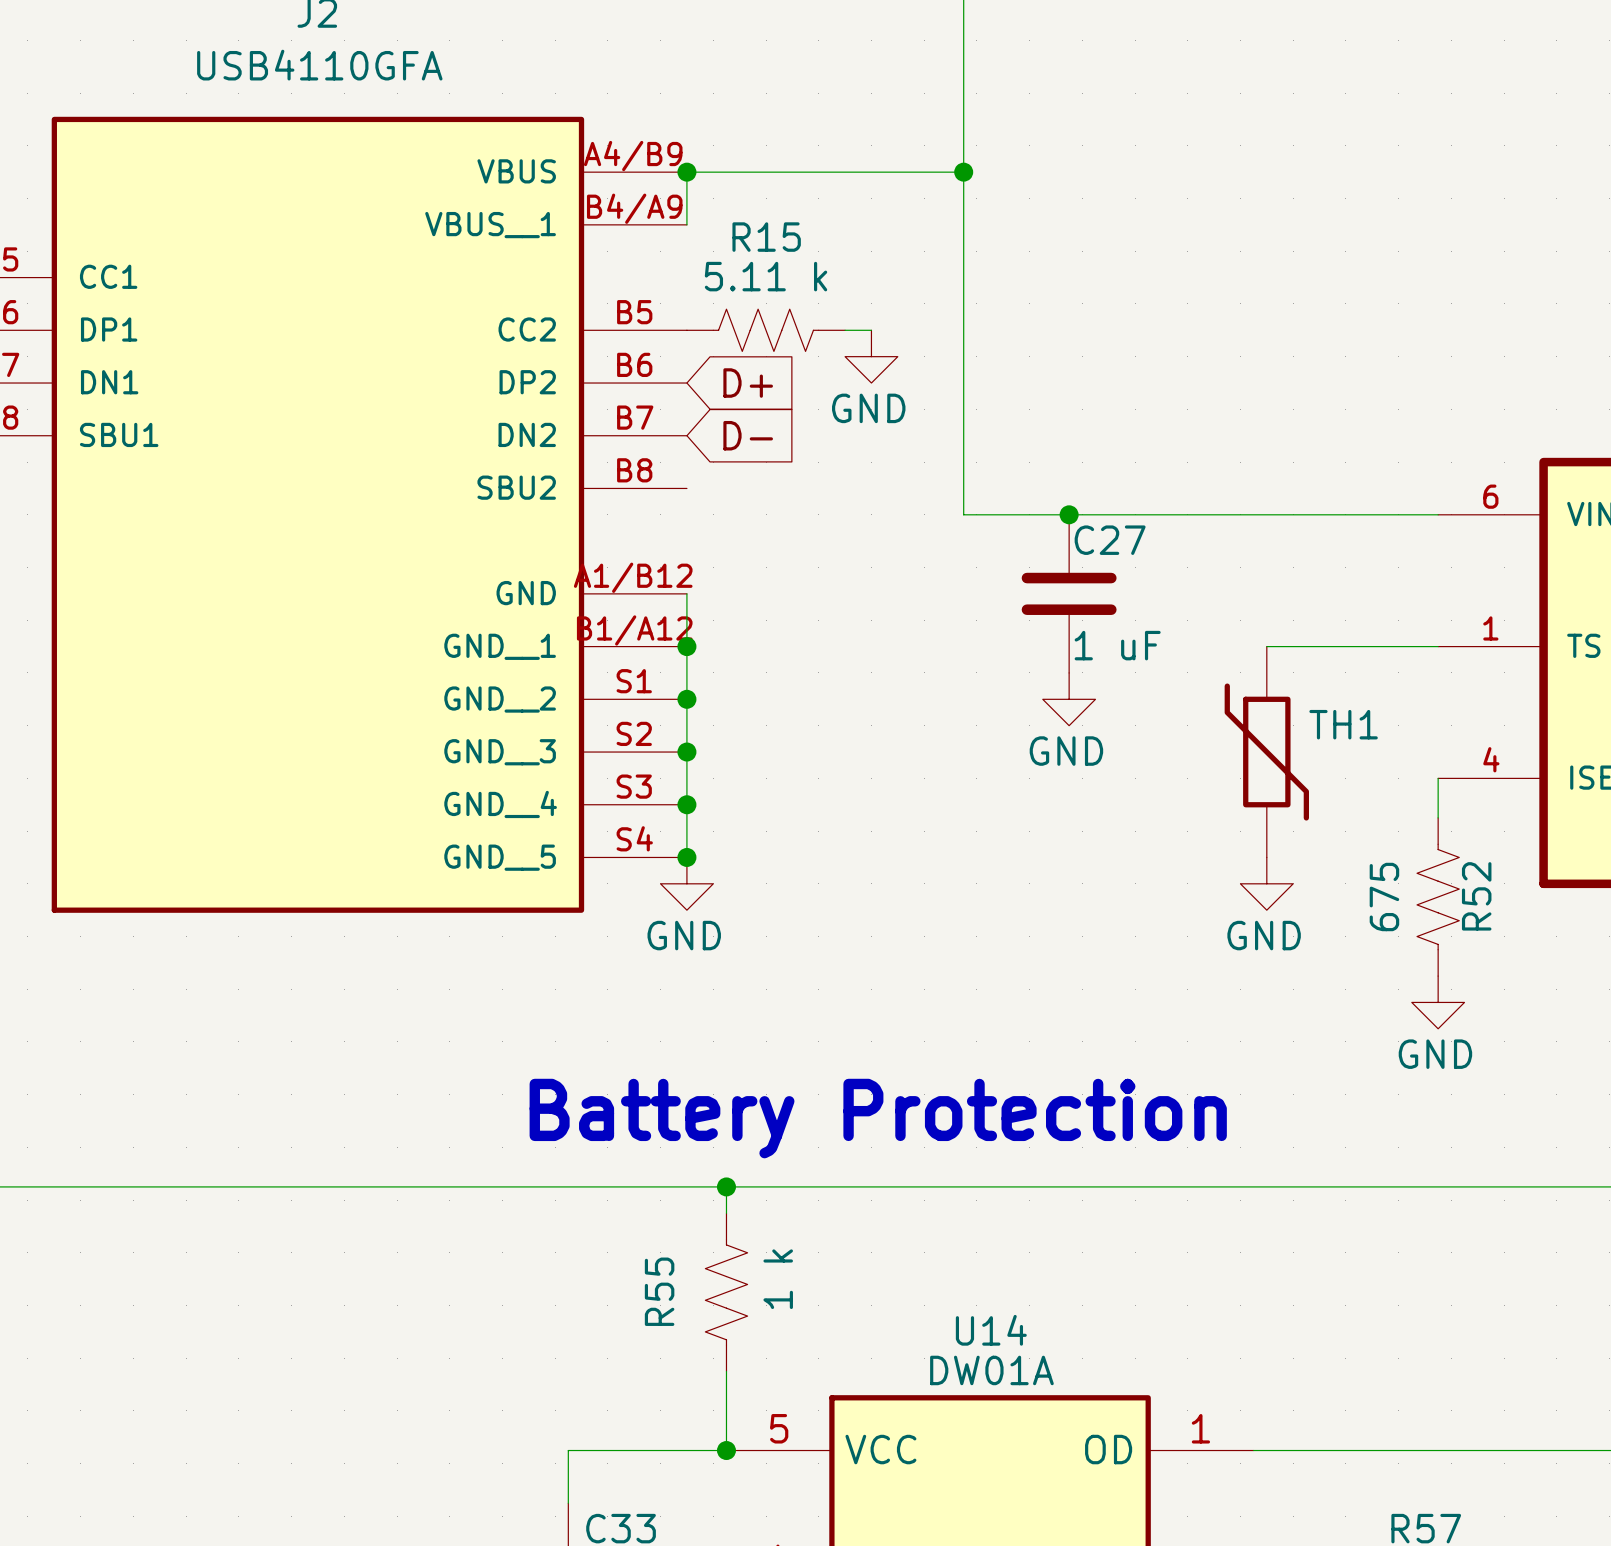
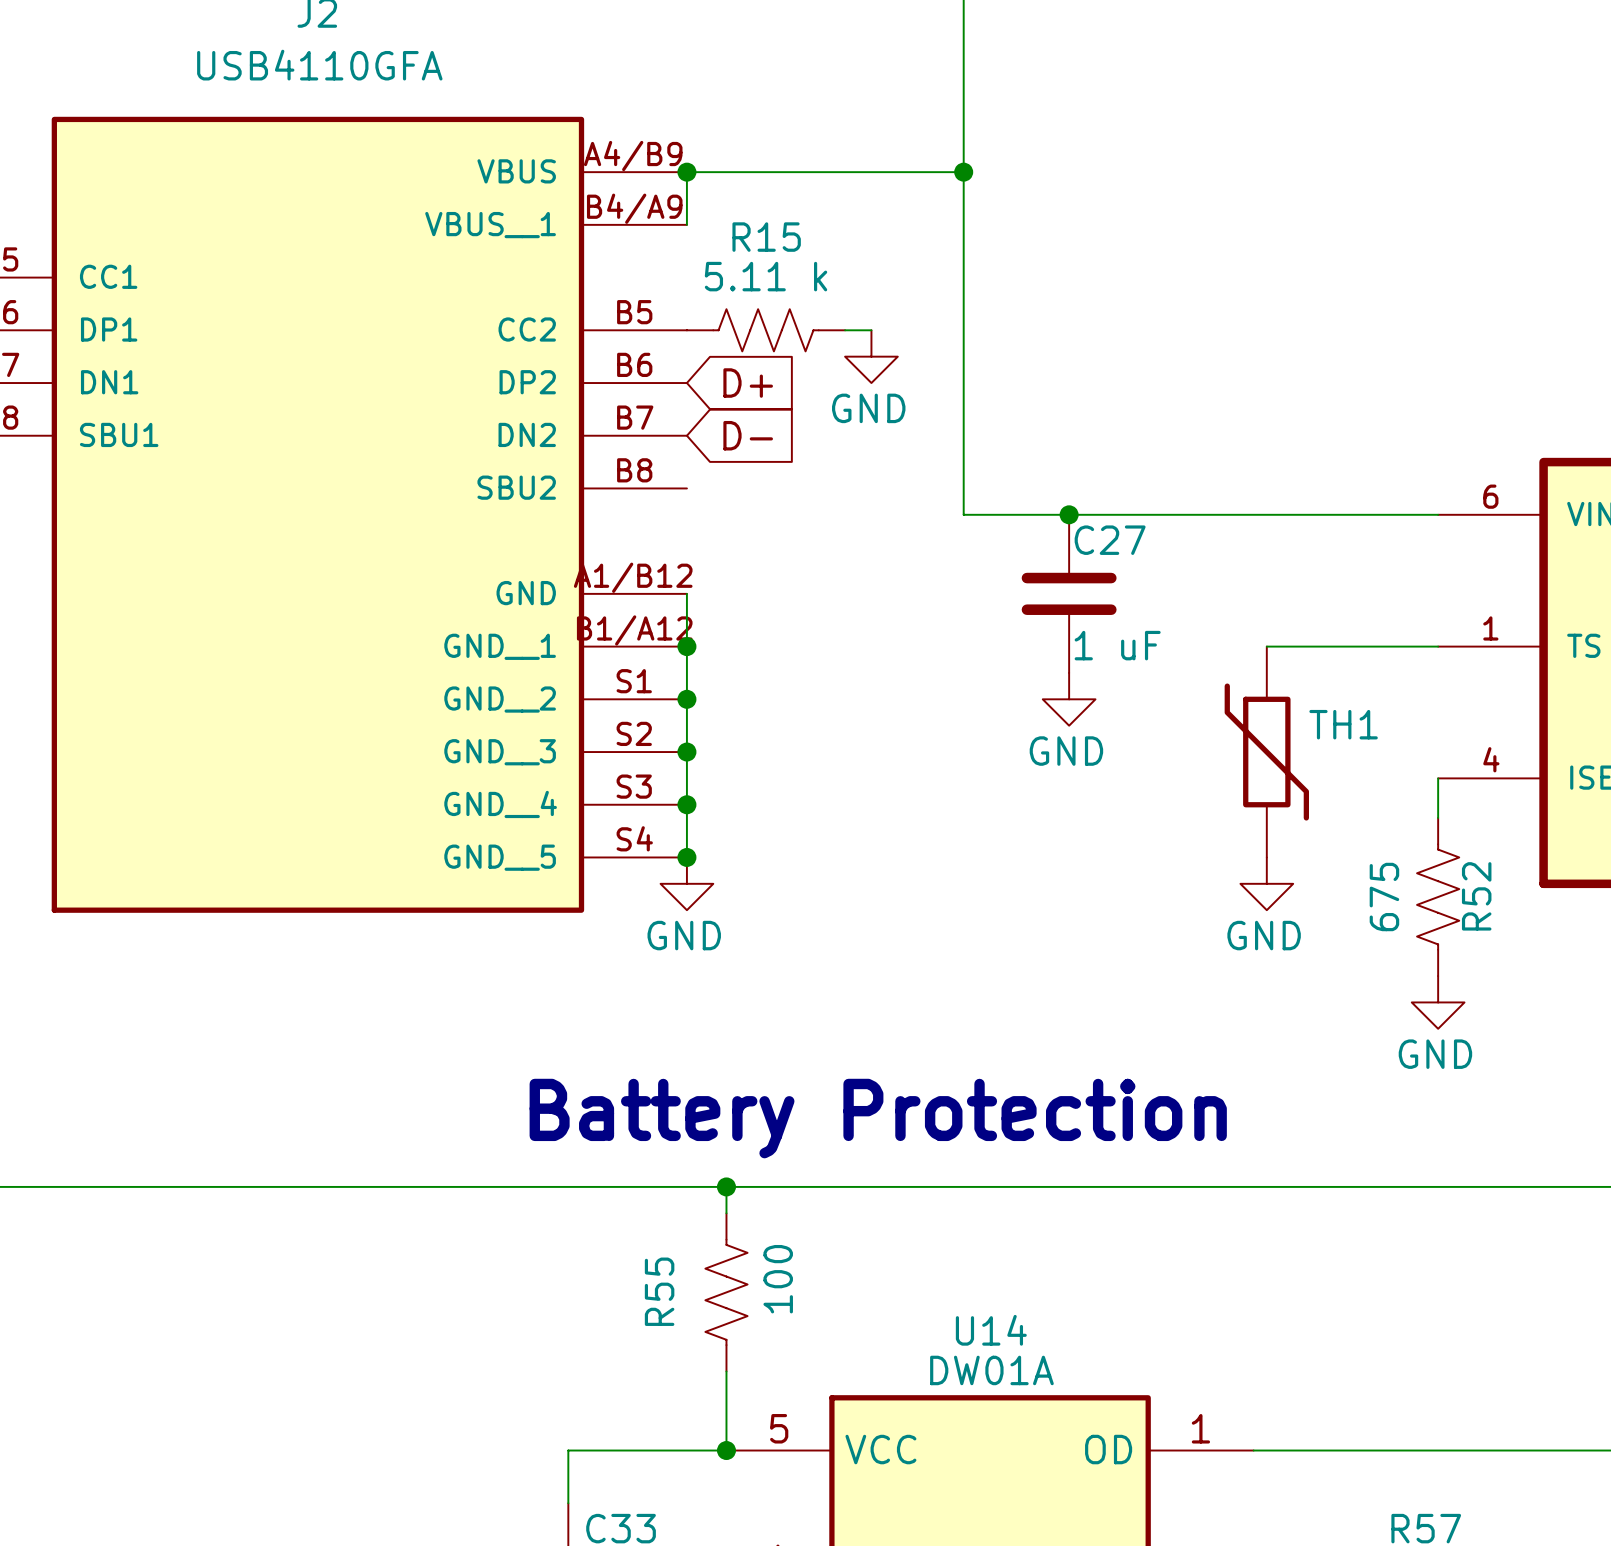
R55 value: 1 k (778, 1279) -> 100 (778, 1279)

